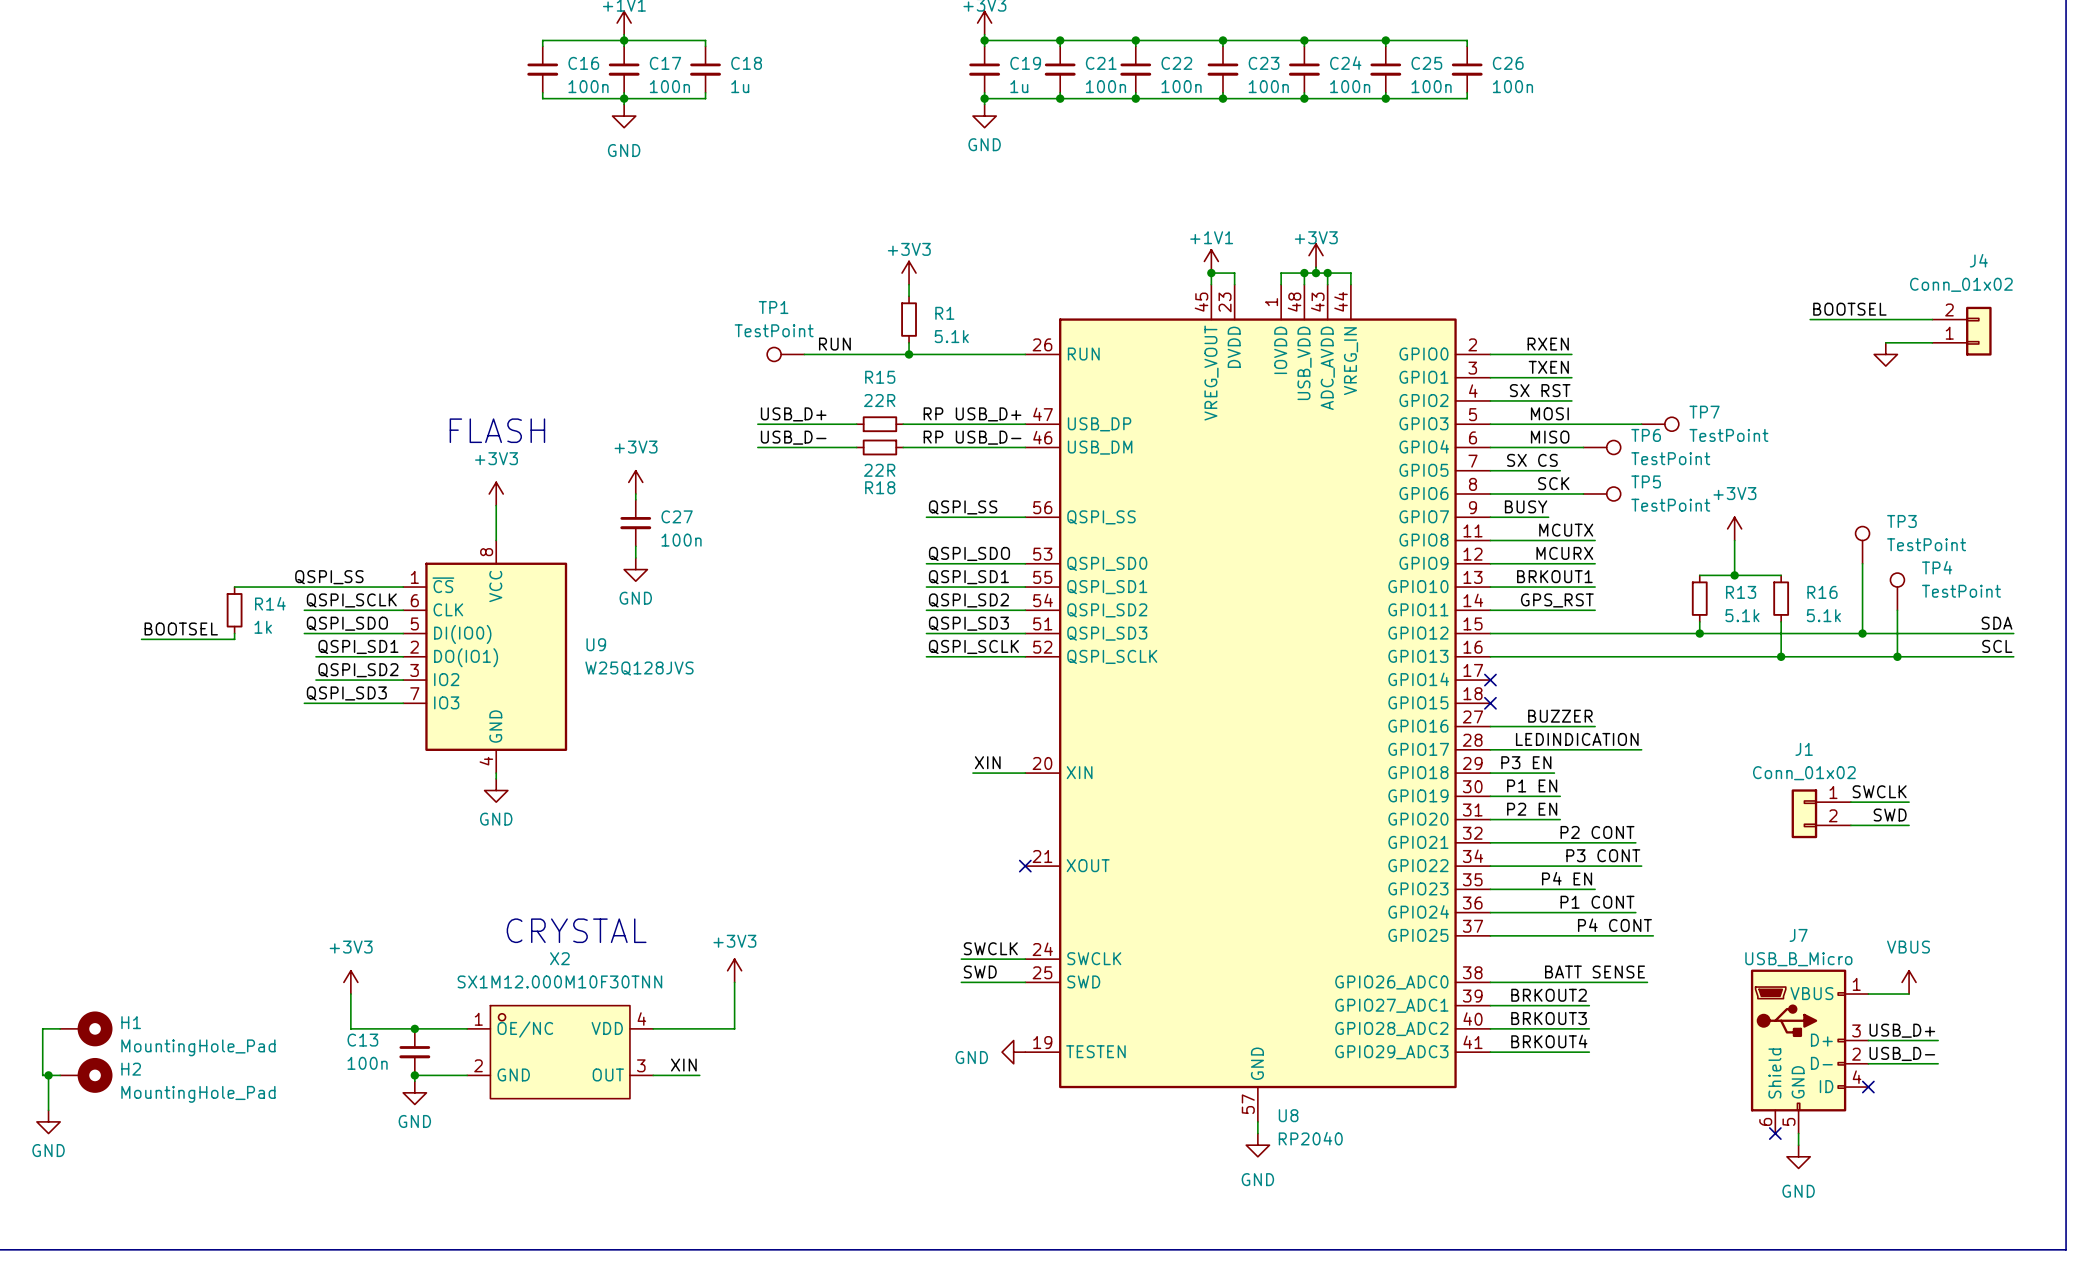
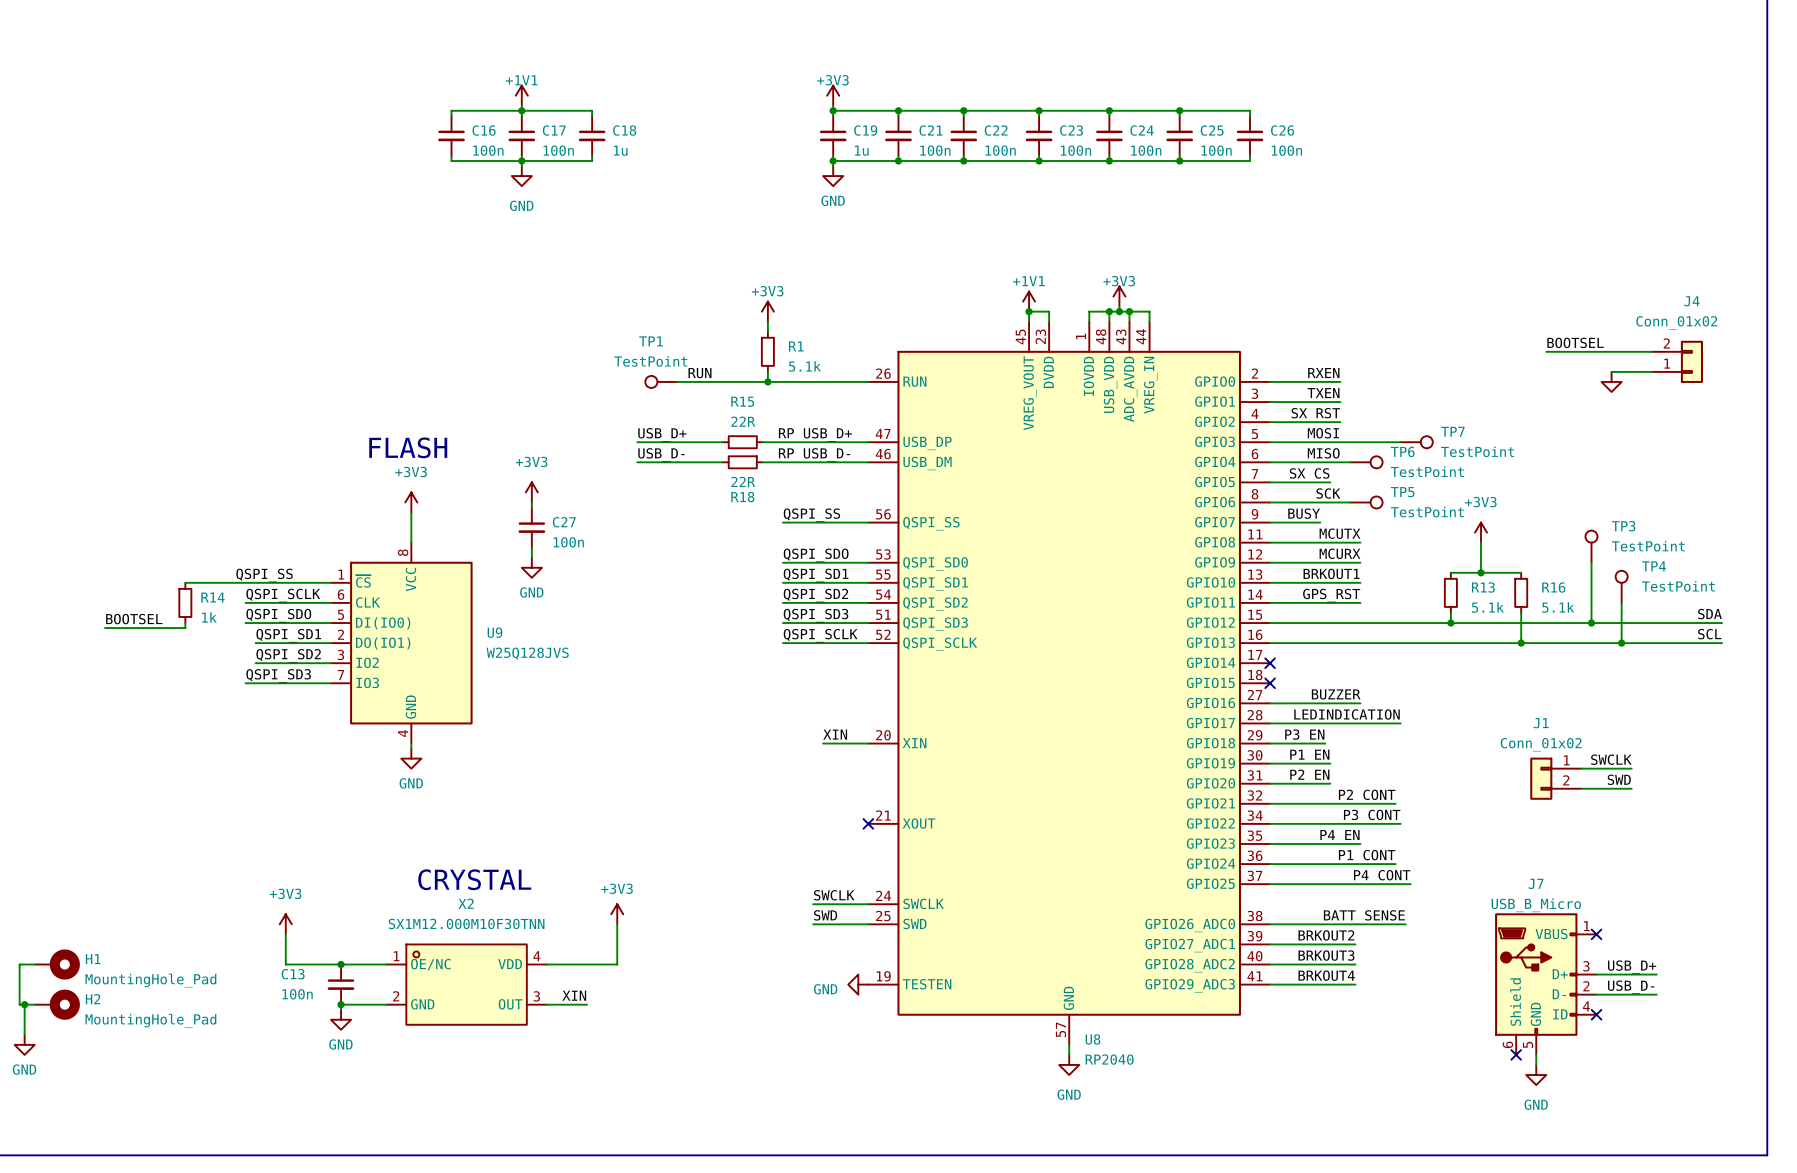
power symbol: VBUS (1909, 982) -> none
wire: (1868, 994) (1909, 994) -> none
no-connect mark: none -> (1596, 934)

